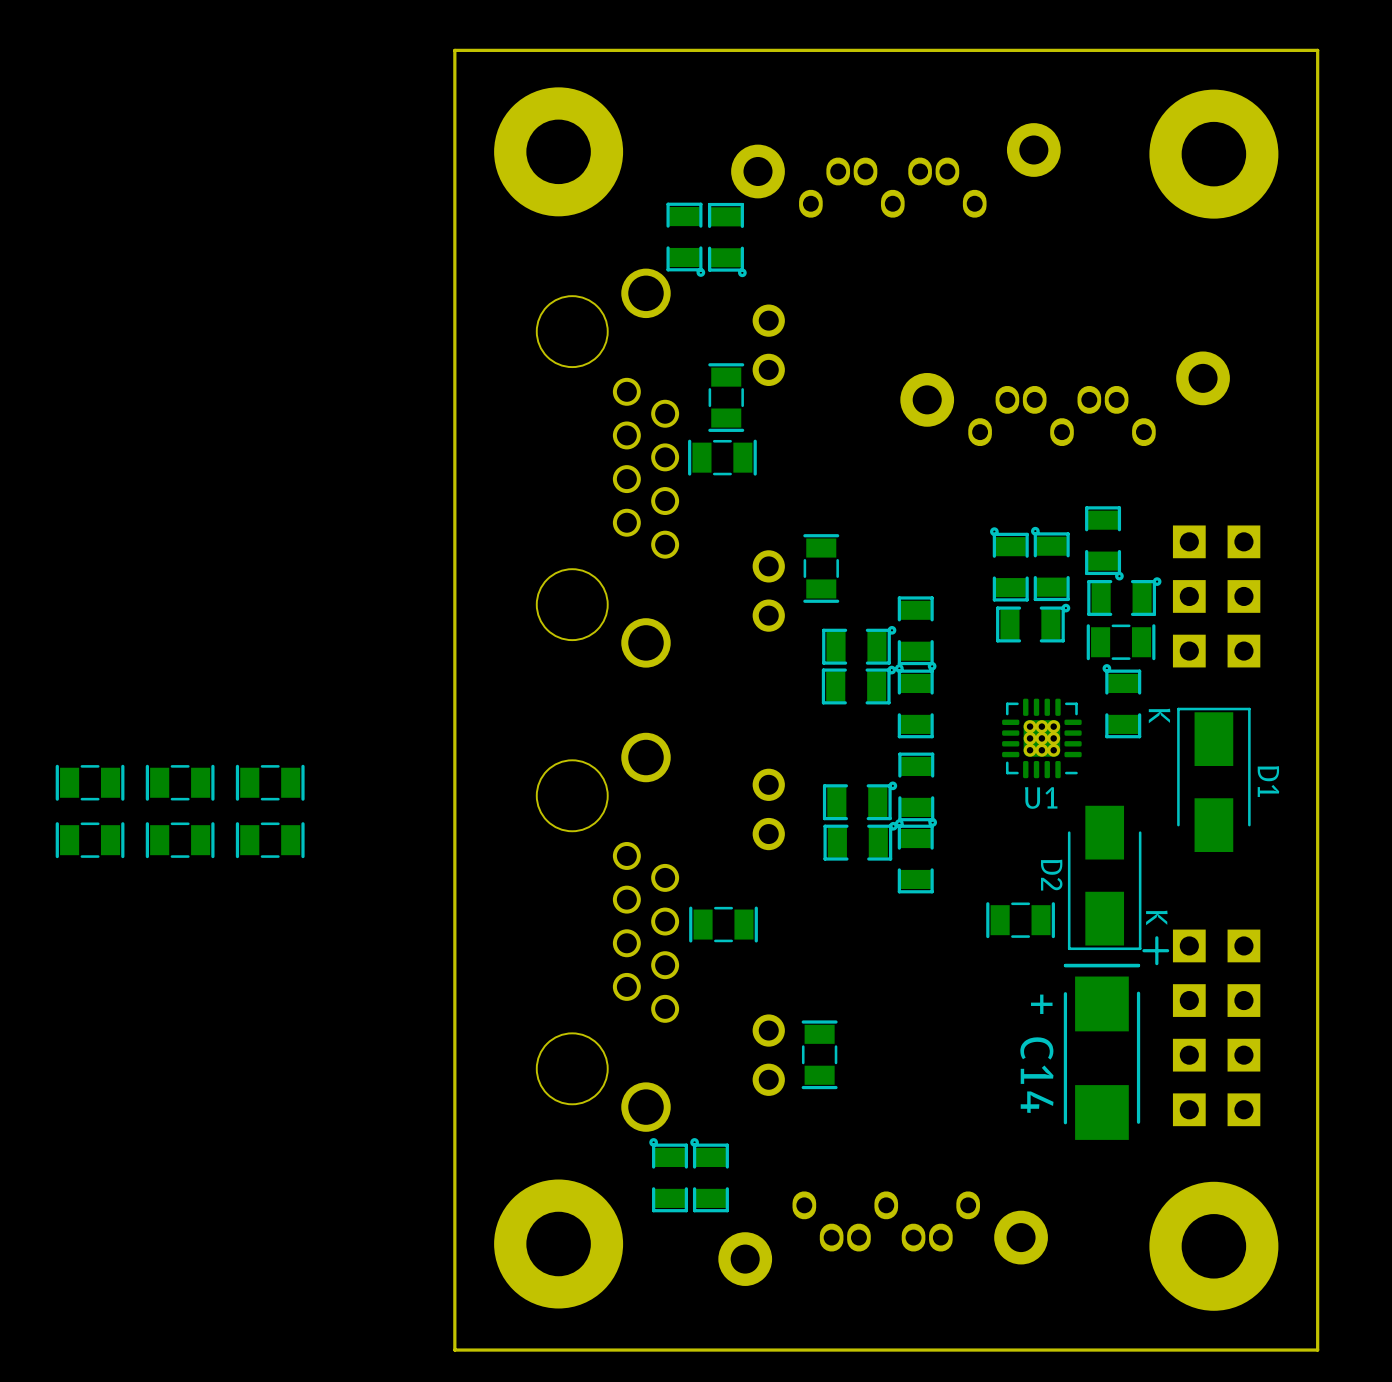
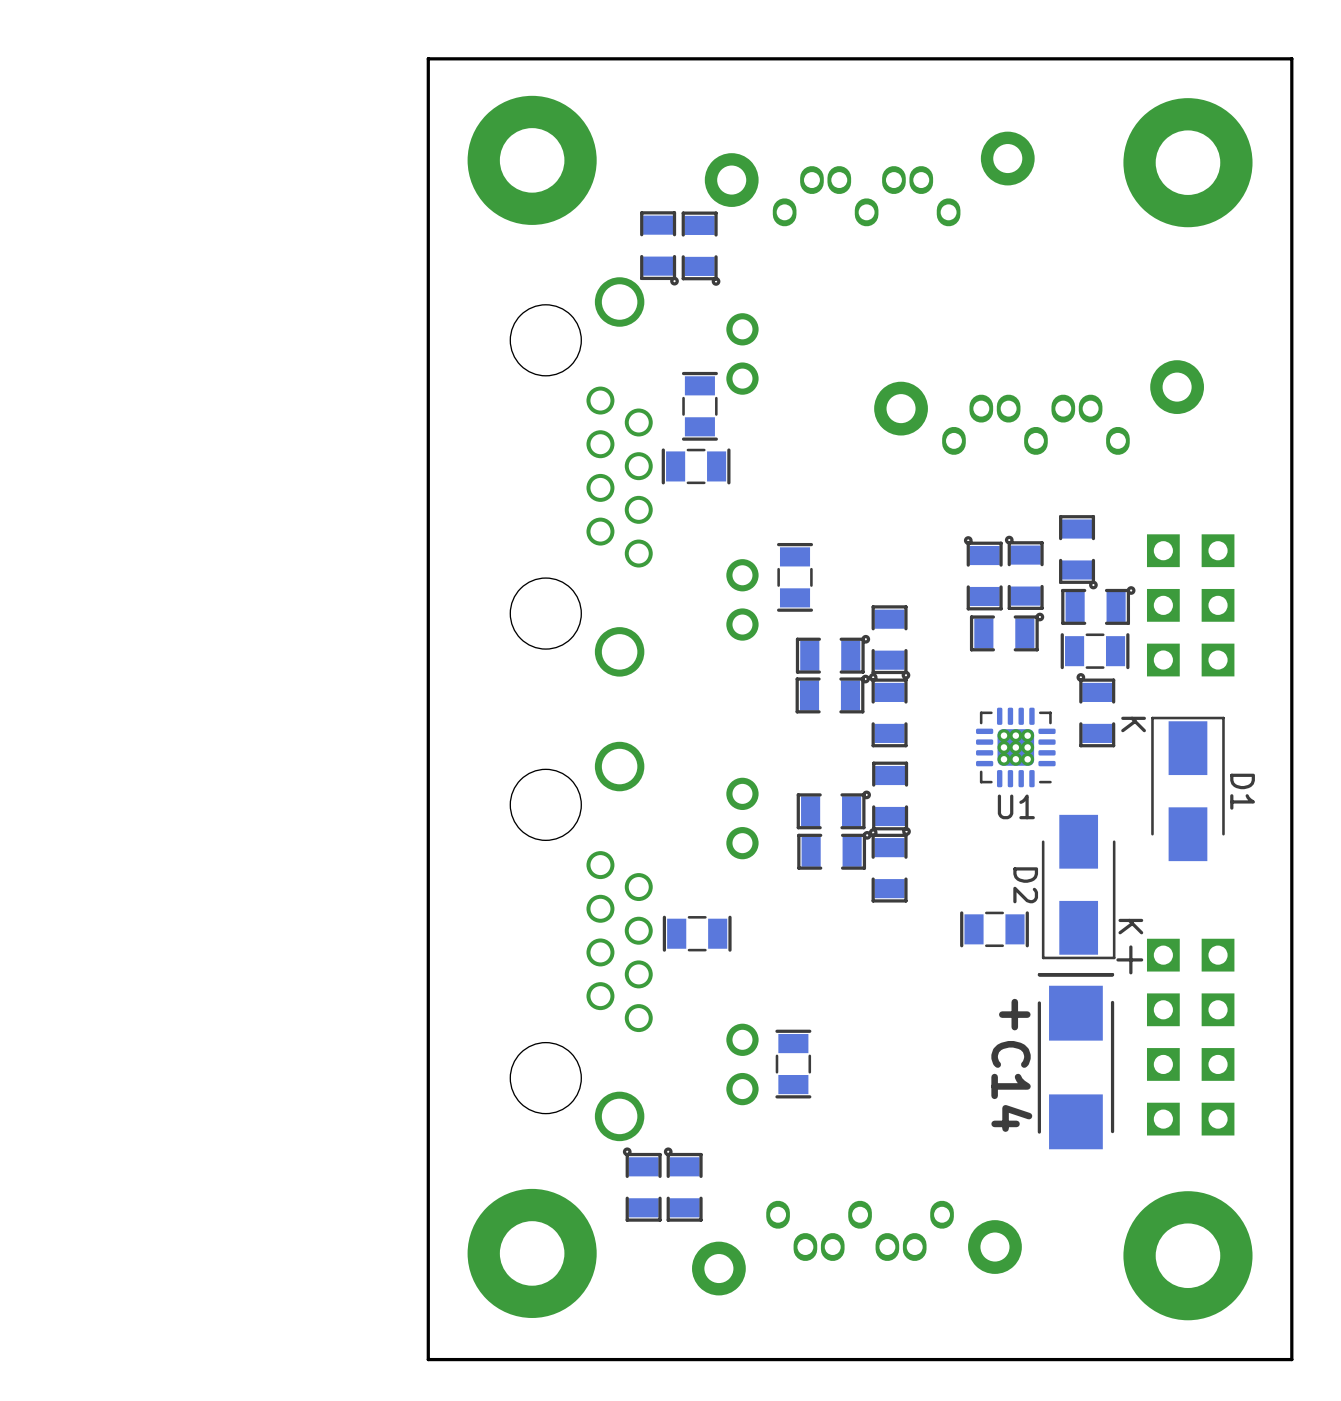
part: (90, 782) -> none
part: (180, 782) -> none
part: (270, 782) -> none
part: (90, 840) -> none
part: (180, 840) -> none
part: (270, 840) -> none

